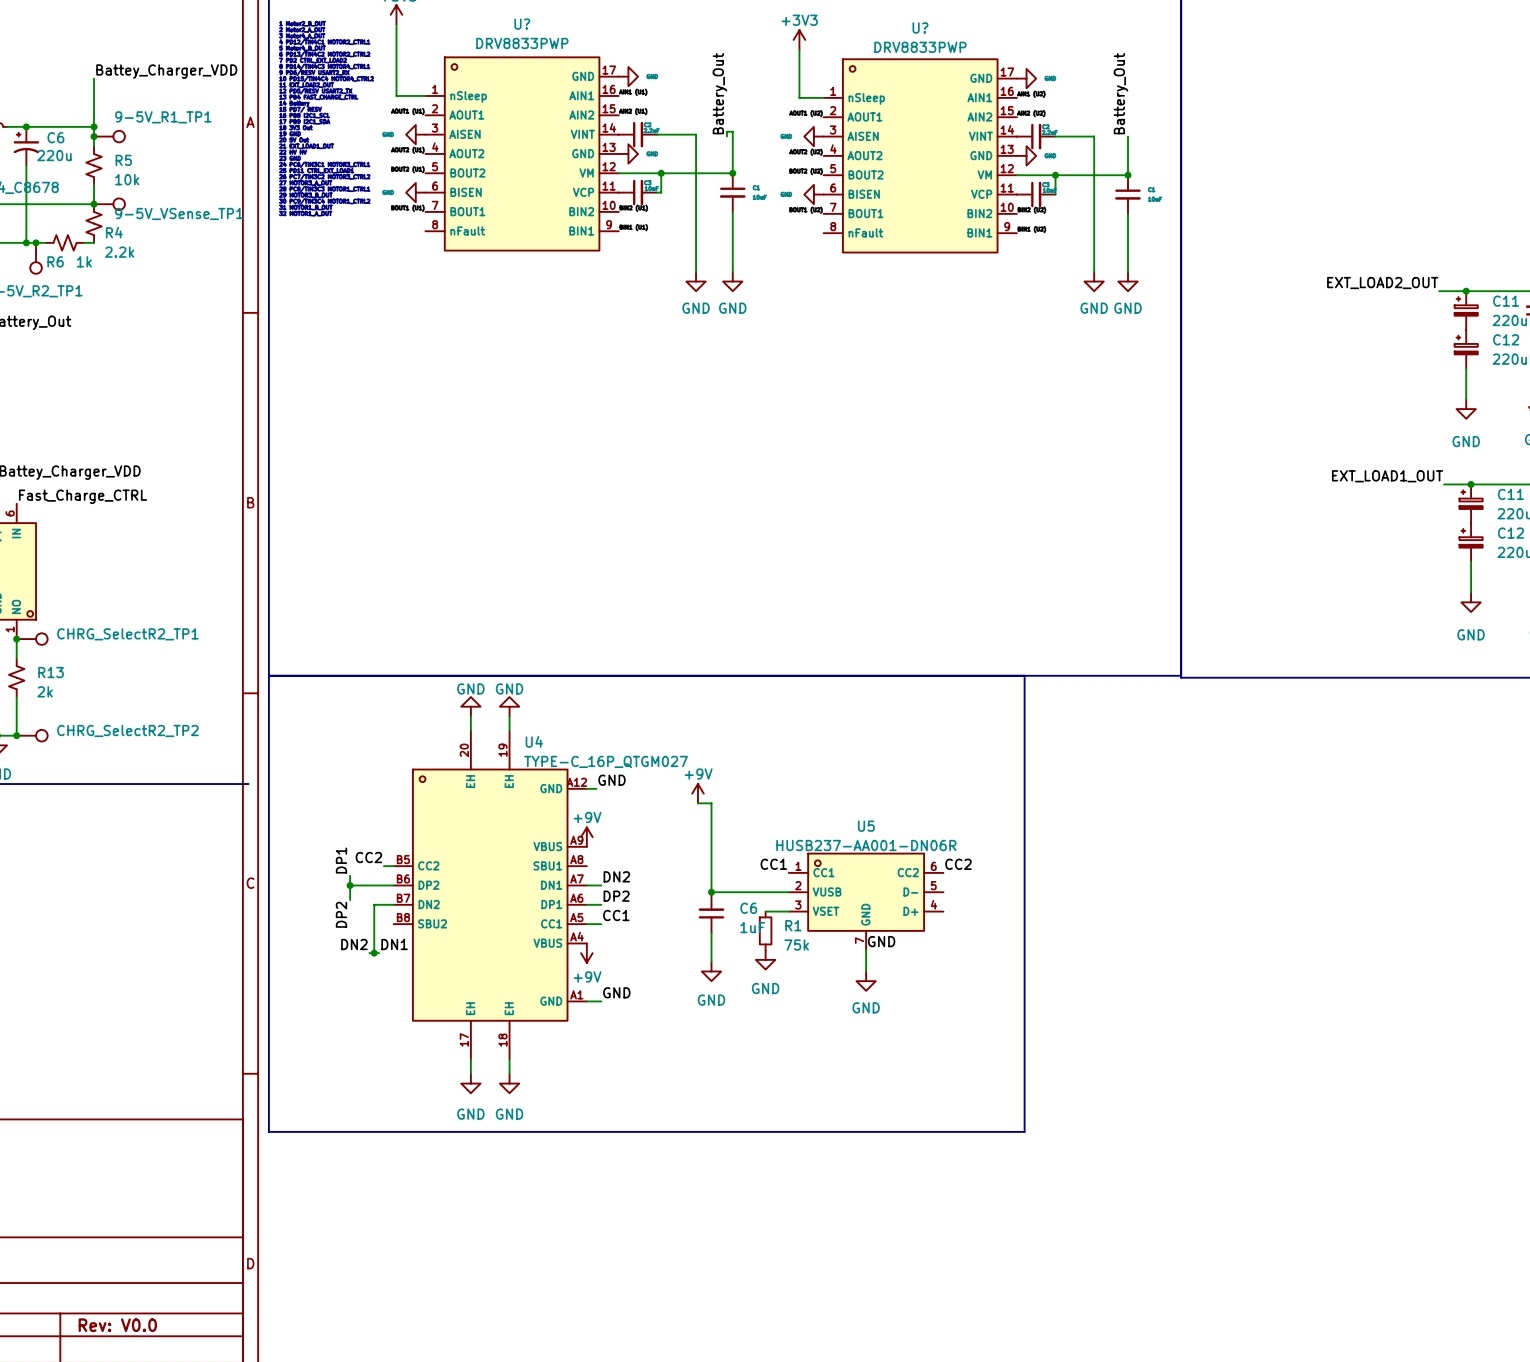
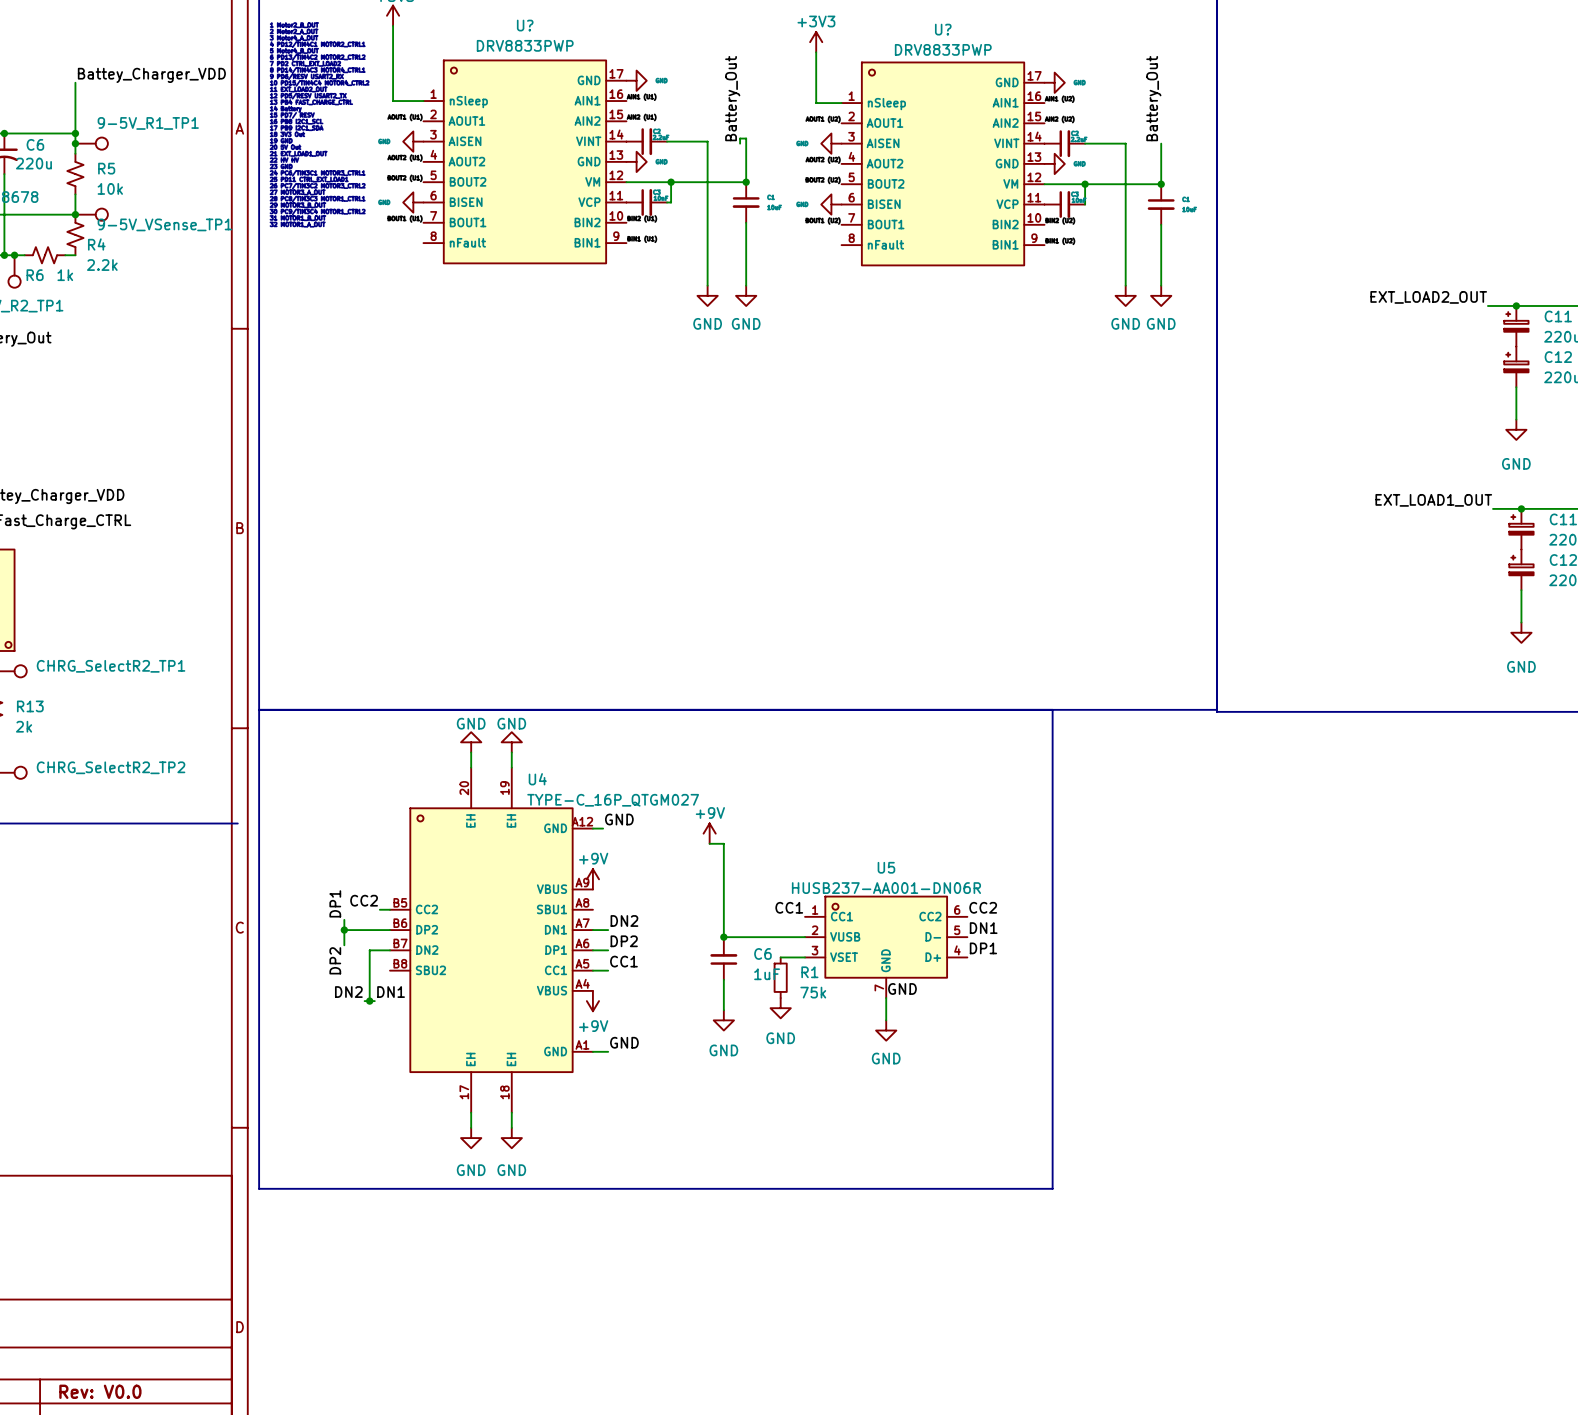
label: none -> DN1 (983, 928)
label: none -> DP1 (983, 948)

